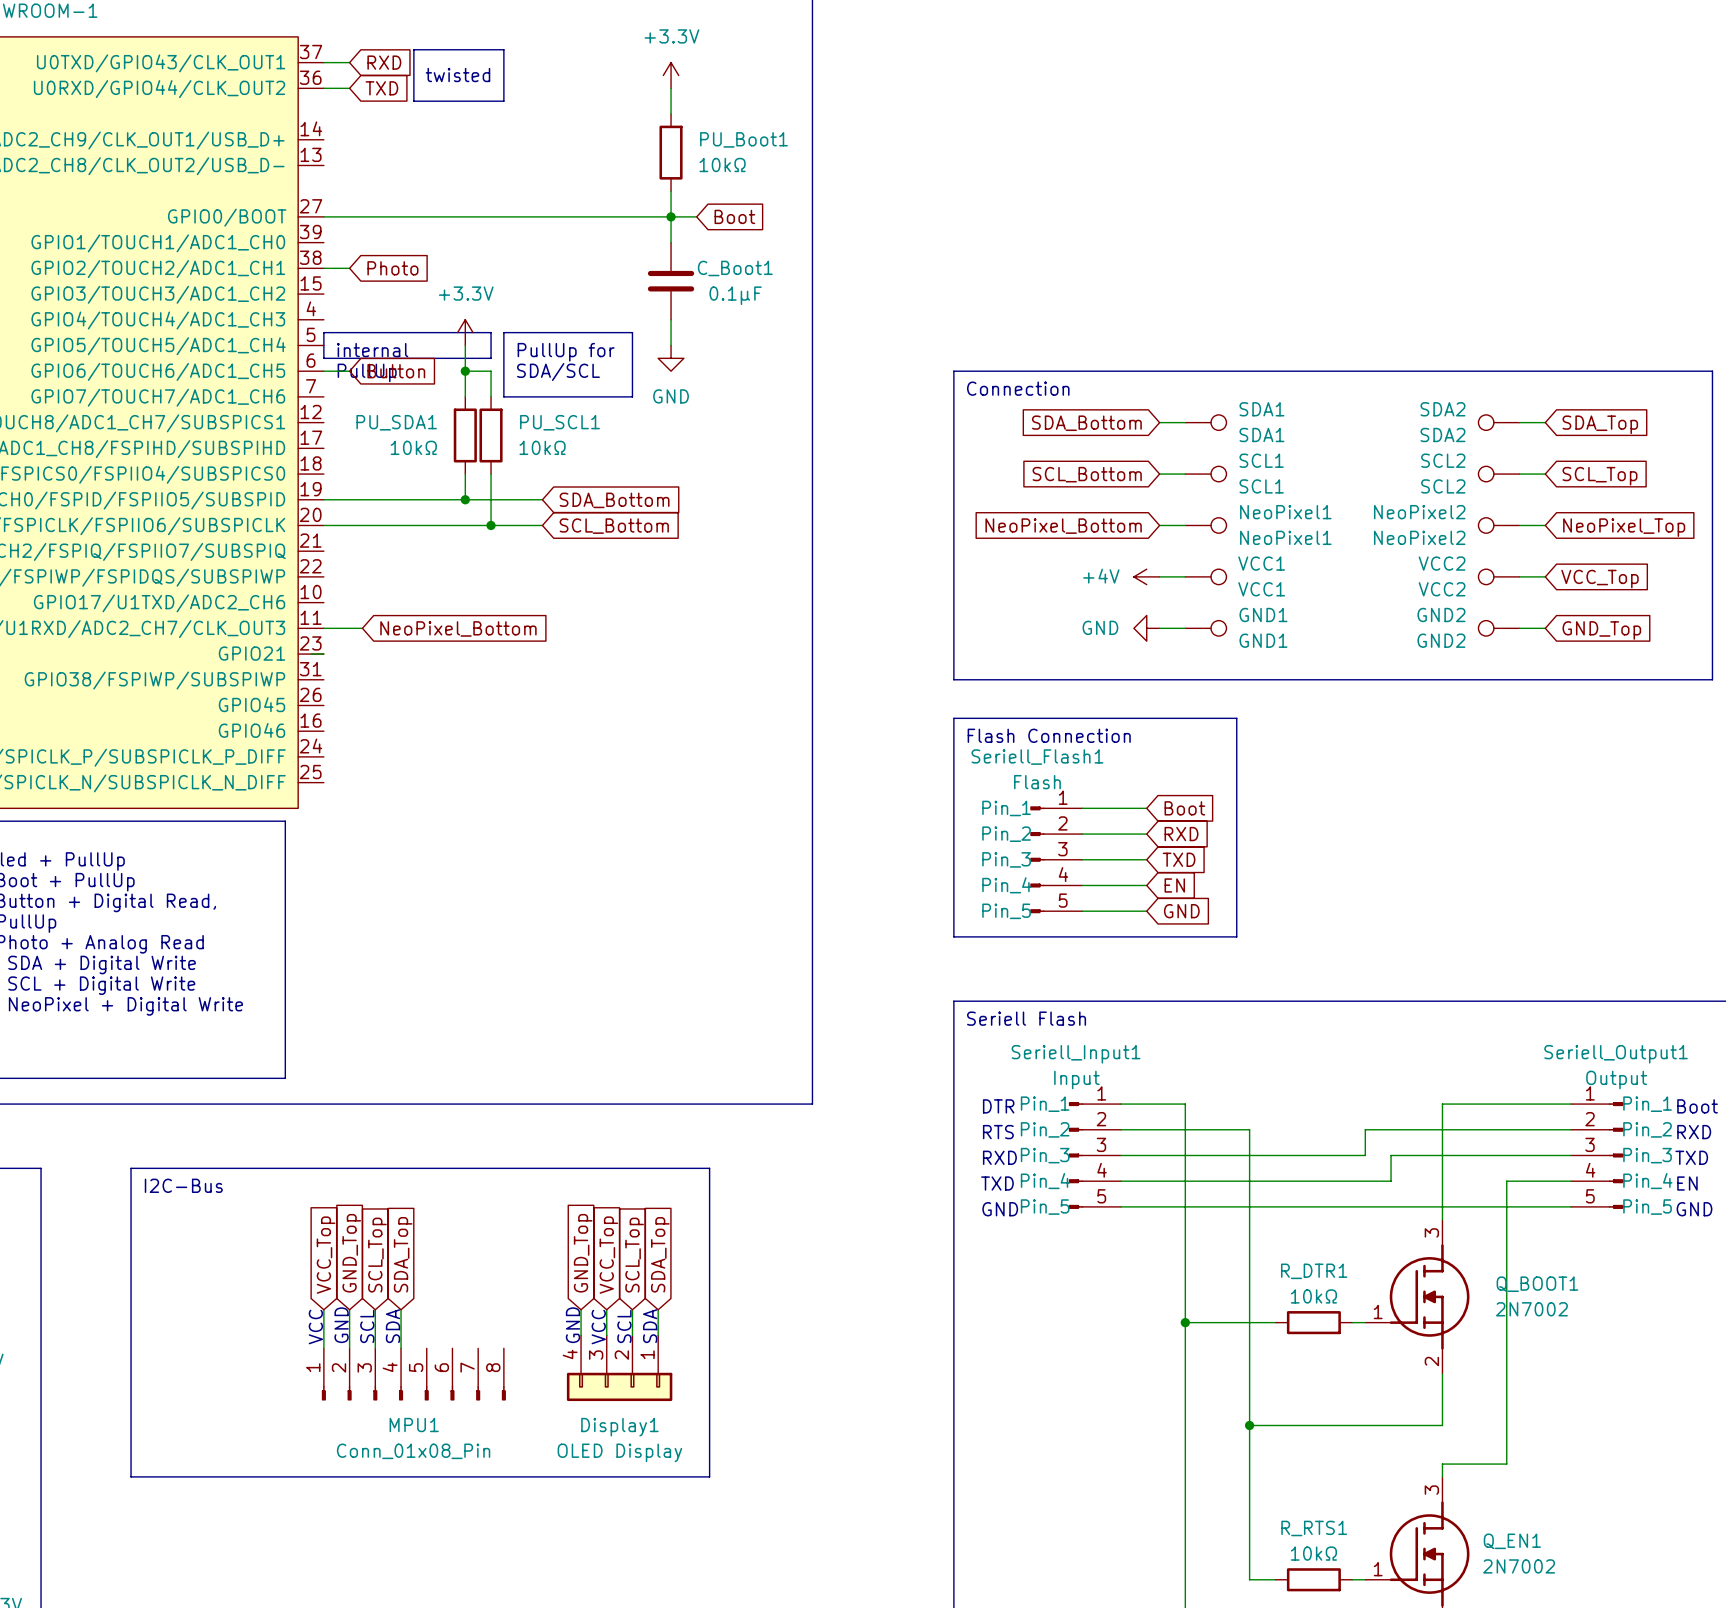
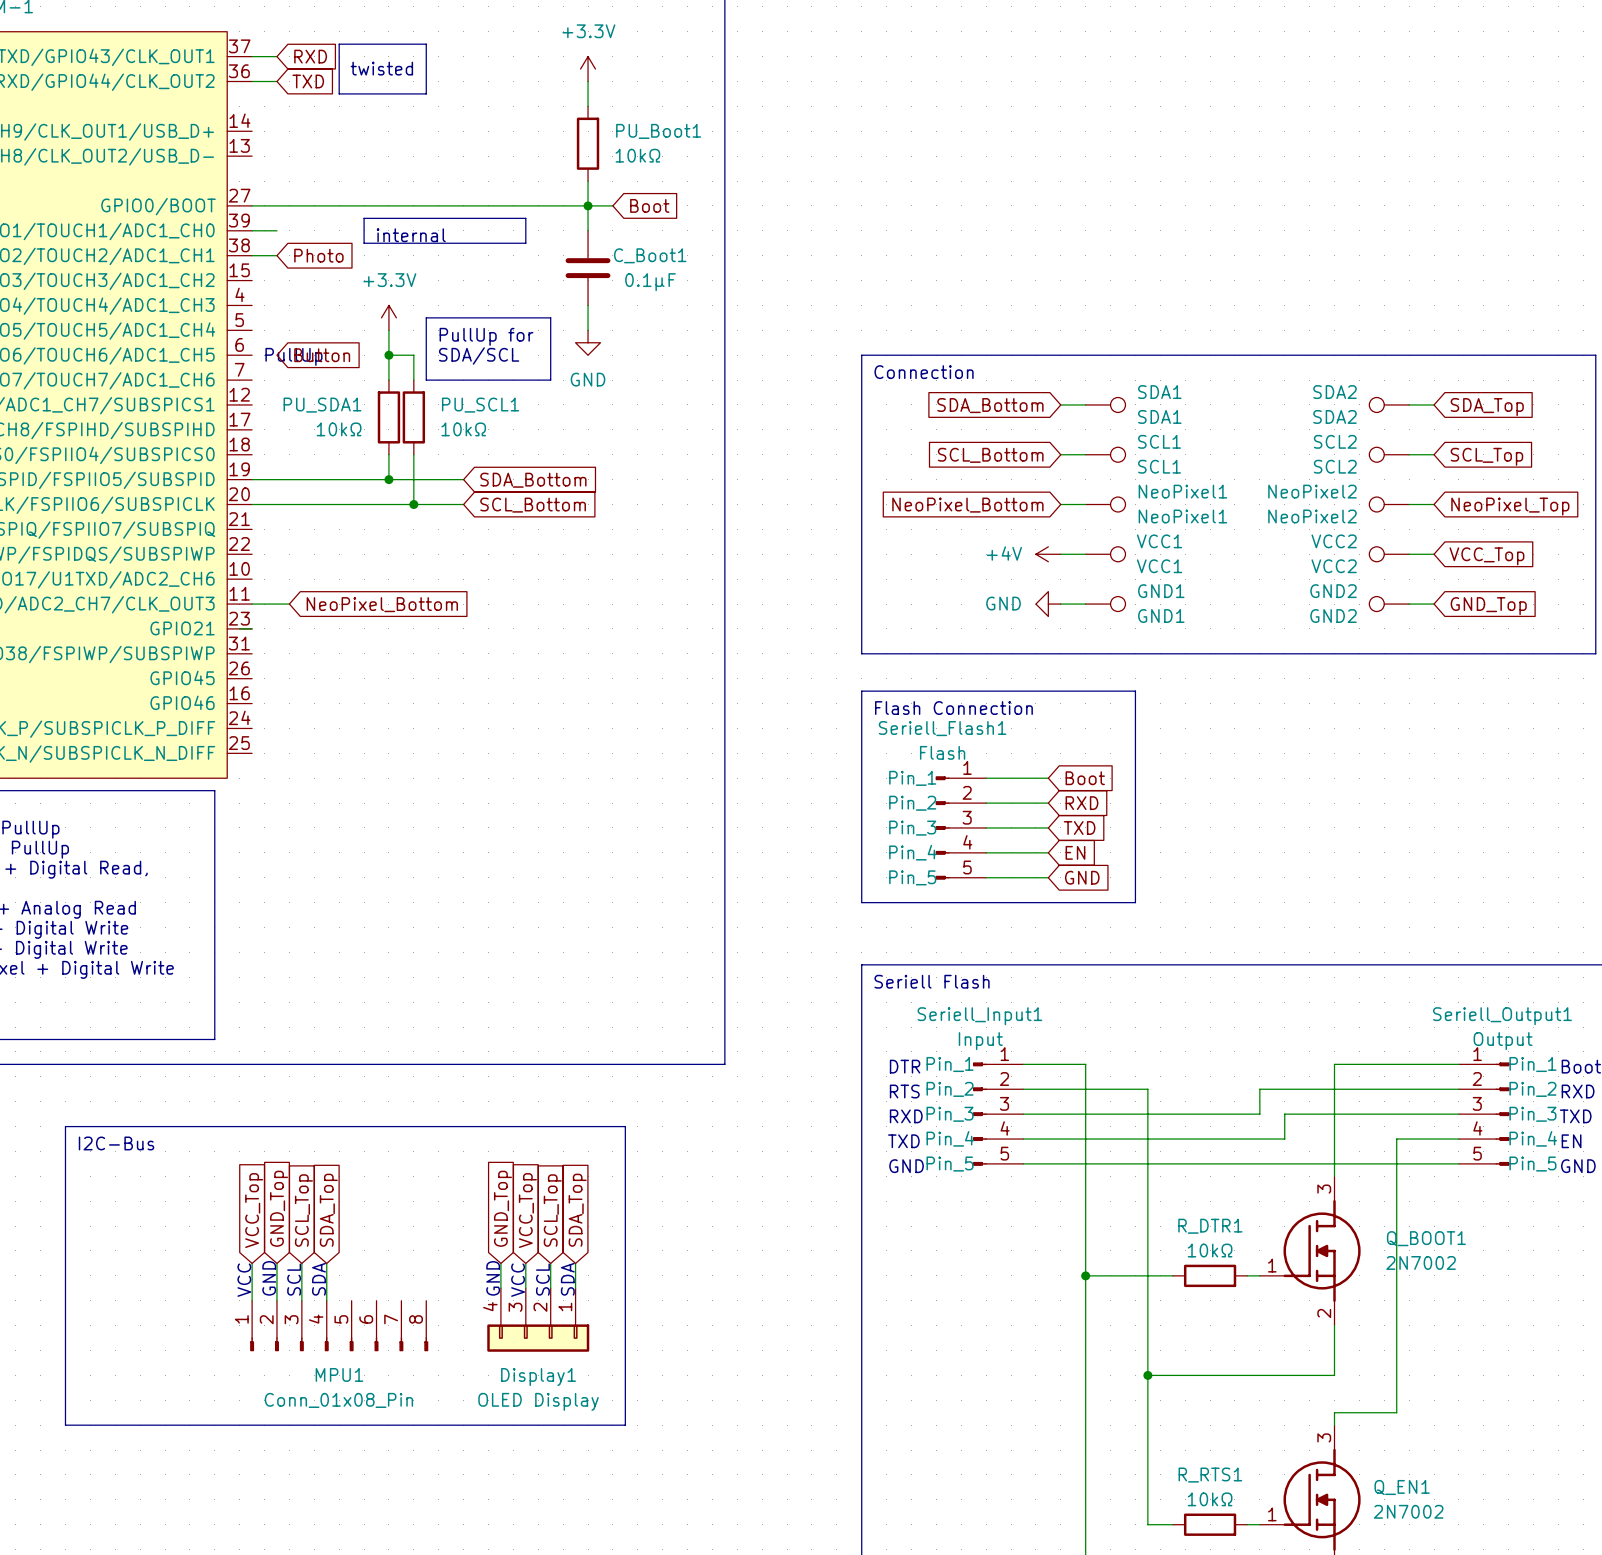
line: (323, 332) (491, 332) (491, 358) (323, 358) (323, 332) -> (364, 218) (525, 218) (525, 243) (364, 243) (364, 218)
text position: internal (372, 350) -> internal (411, 235)
wire: (323, 371) (349, 371) -> (252, 230) (276, 230)

